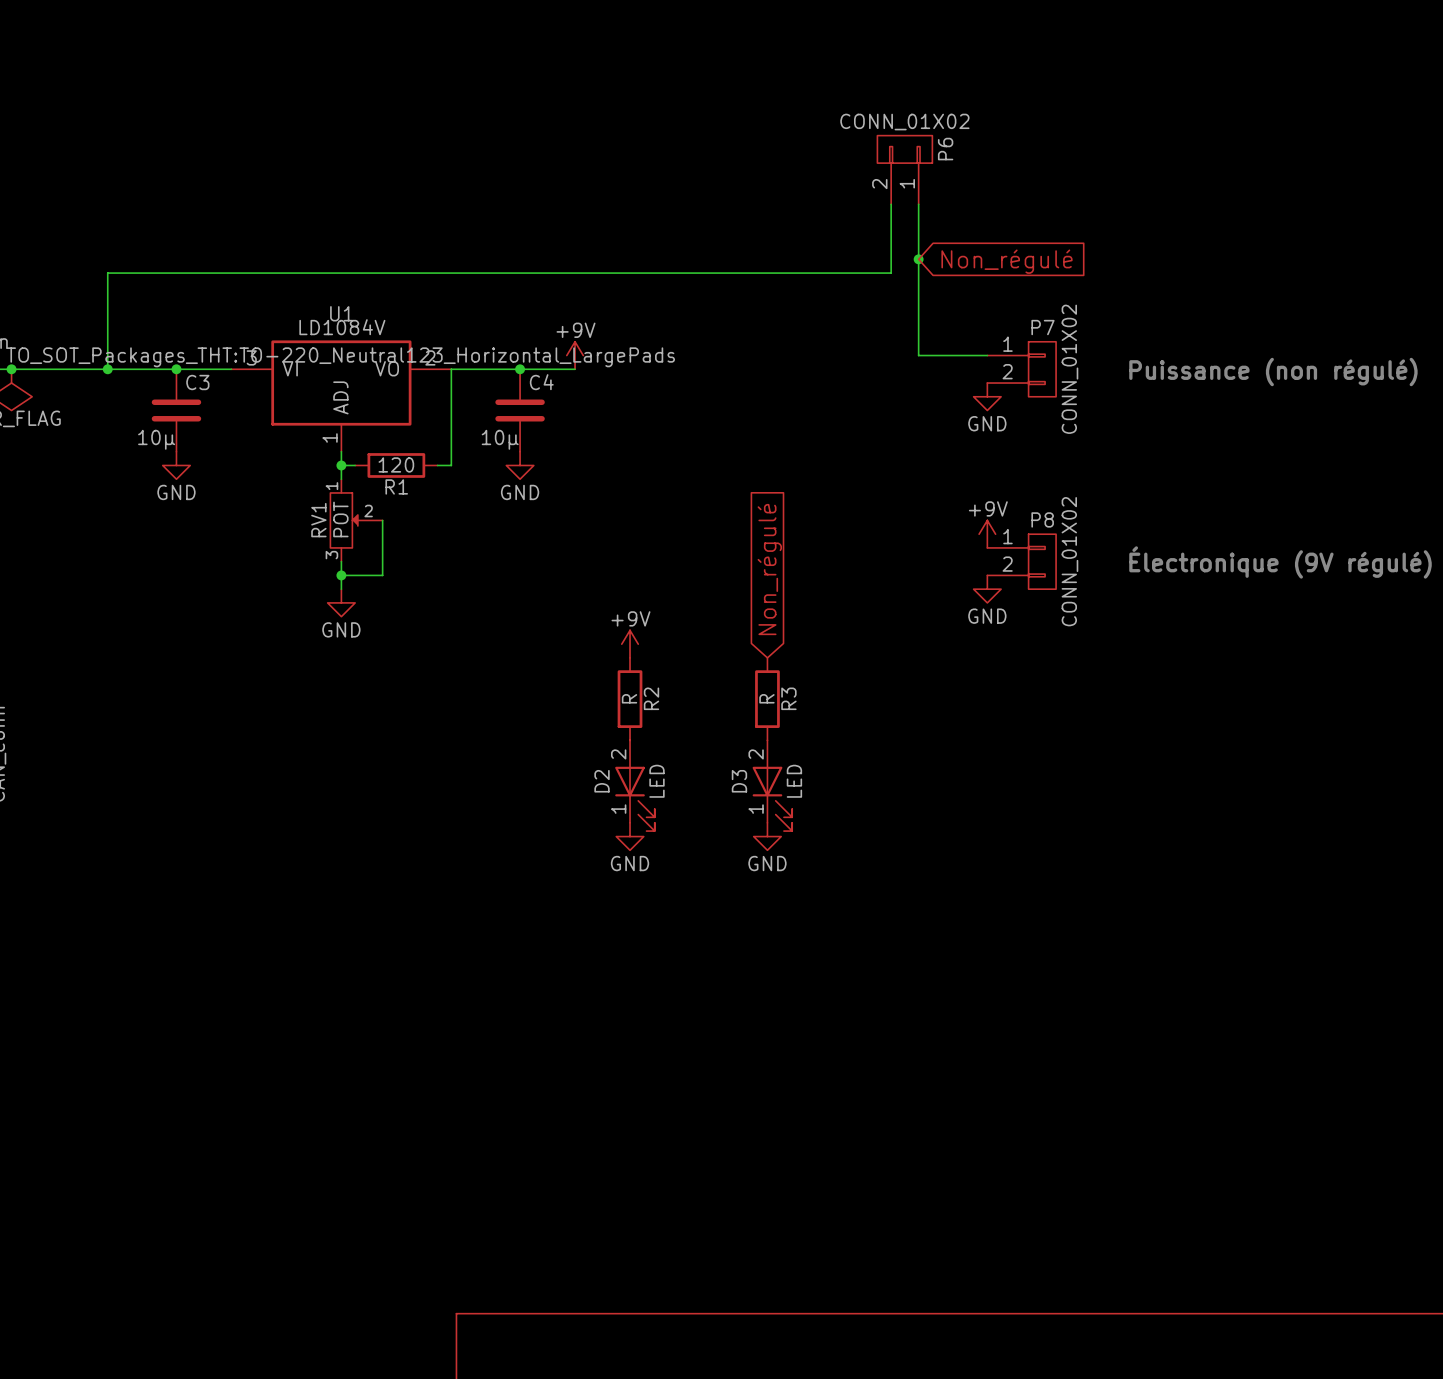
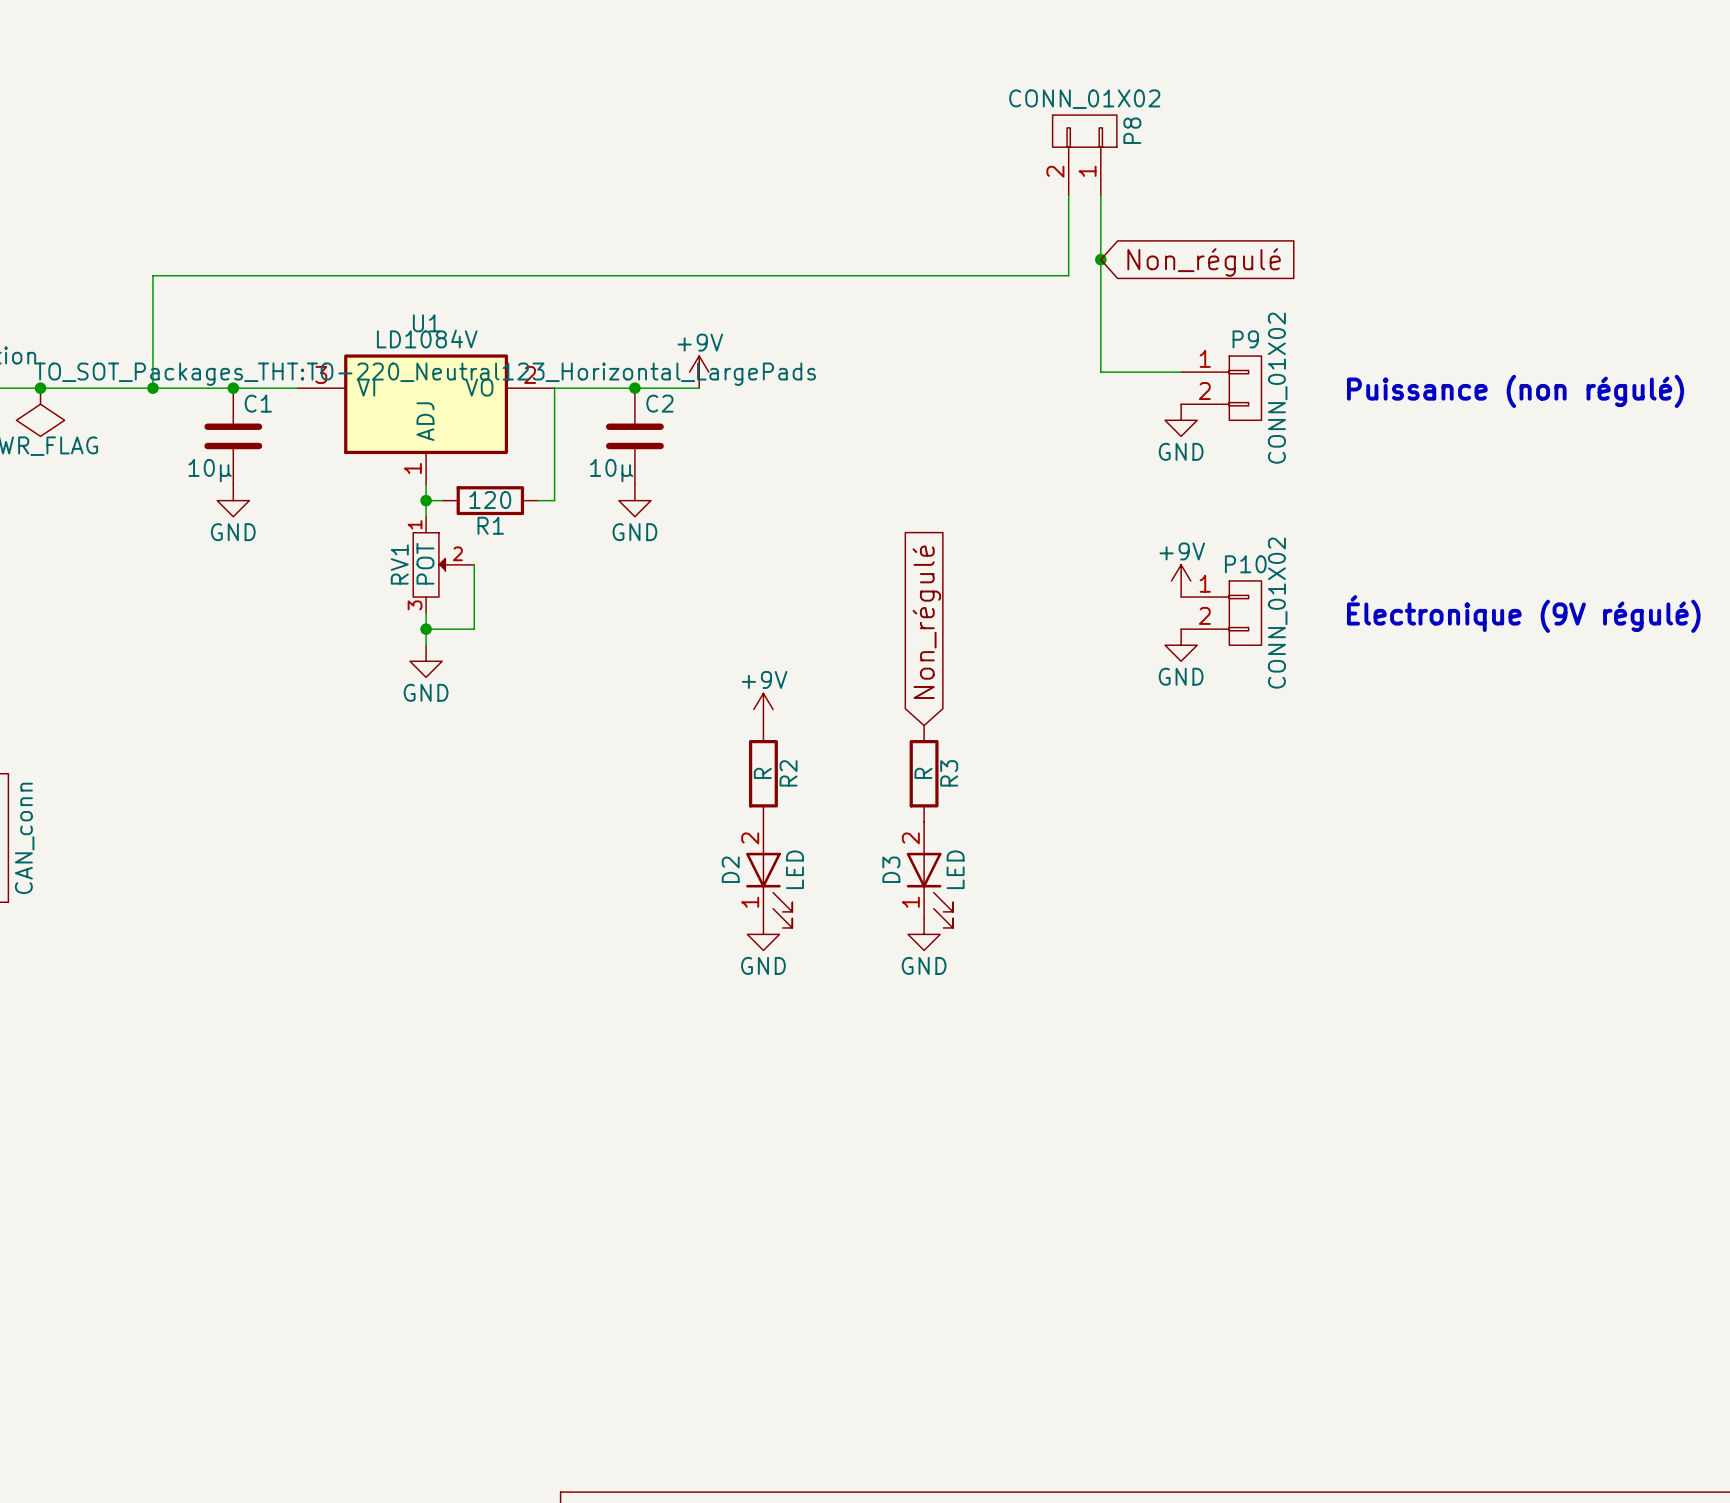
P6 name: P6 (945, 149) -> P8 (1132, 130)
P7 name: P7 (1042, 327) -> P9 (1245, 339)
C3 name: C3 (197, 382) -> C1 (258, 403)
C4 name: C4 (541, 382) -> C2 (659, 403)
P8 name: P8 (1042, 519) -> P10 (1245, 564)

